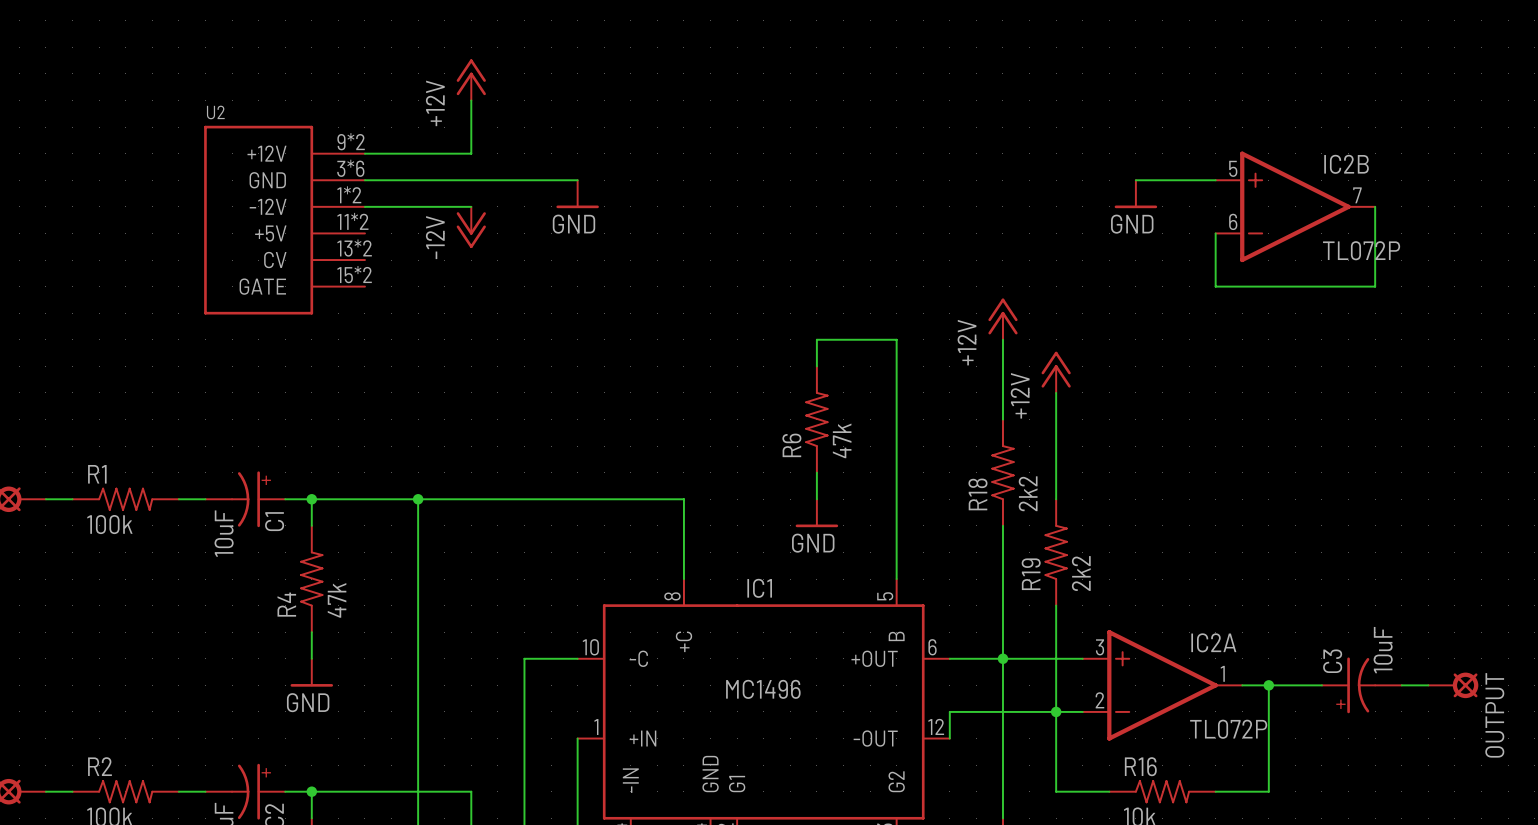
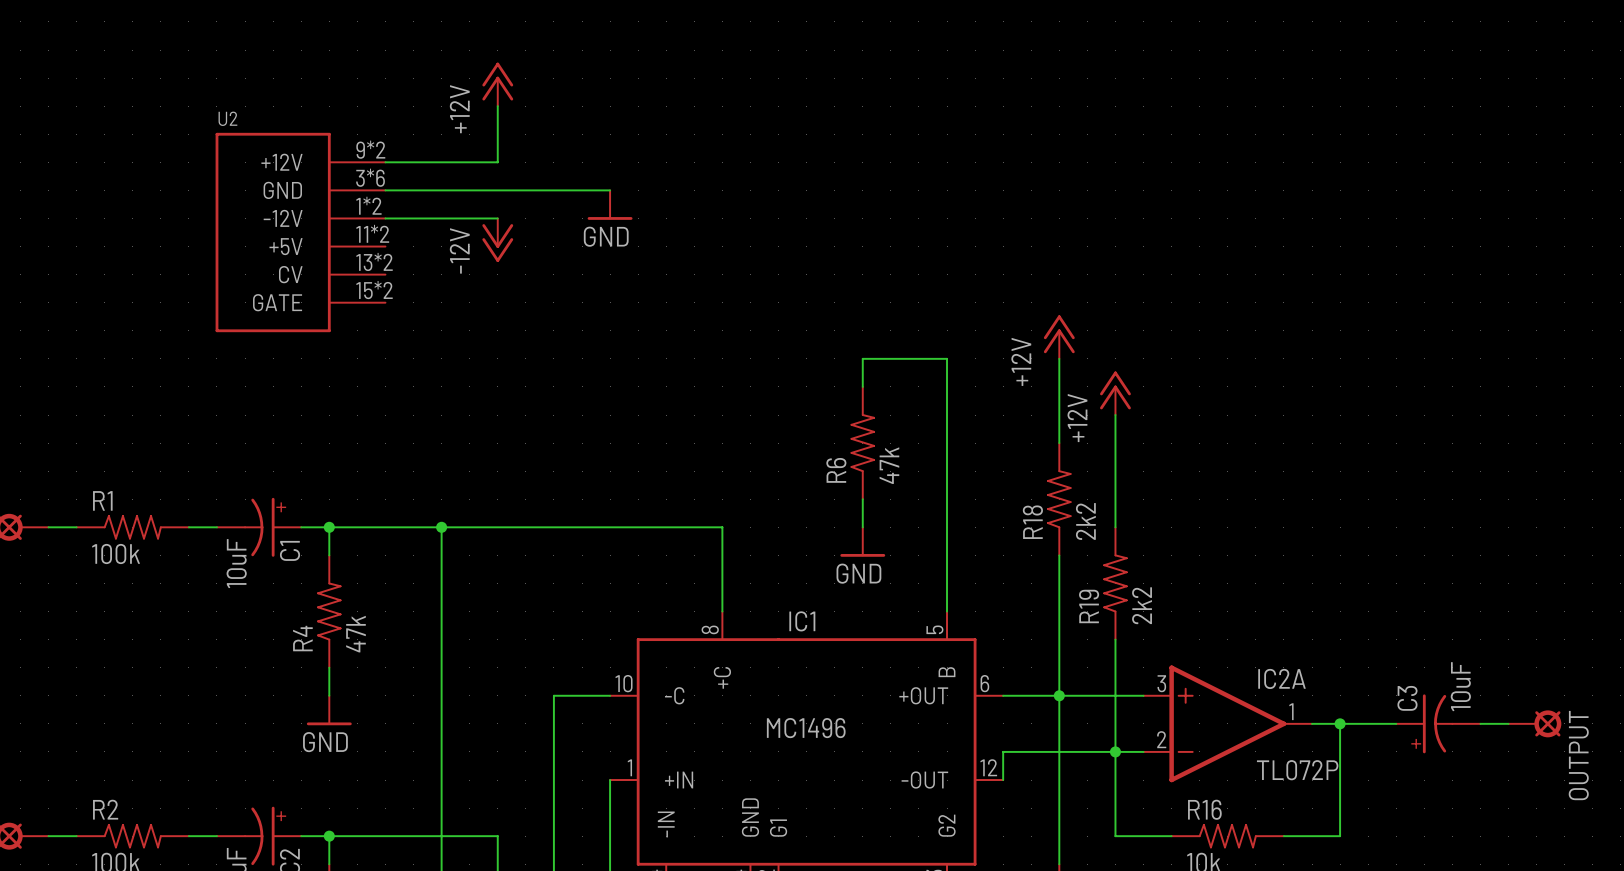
wire: (1135, 180) (1215, 180) -> none
power symbol: GND (1135, 194) -> none
IC2B: TL072P (1295, 206) -> none
wire: (1375, 206) (1375, 286) (1215, 286) (1215, 233) -> none

